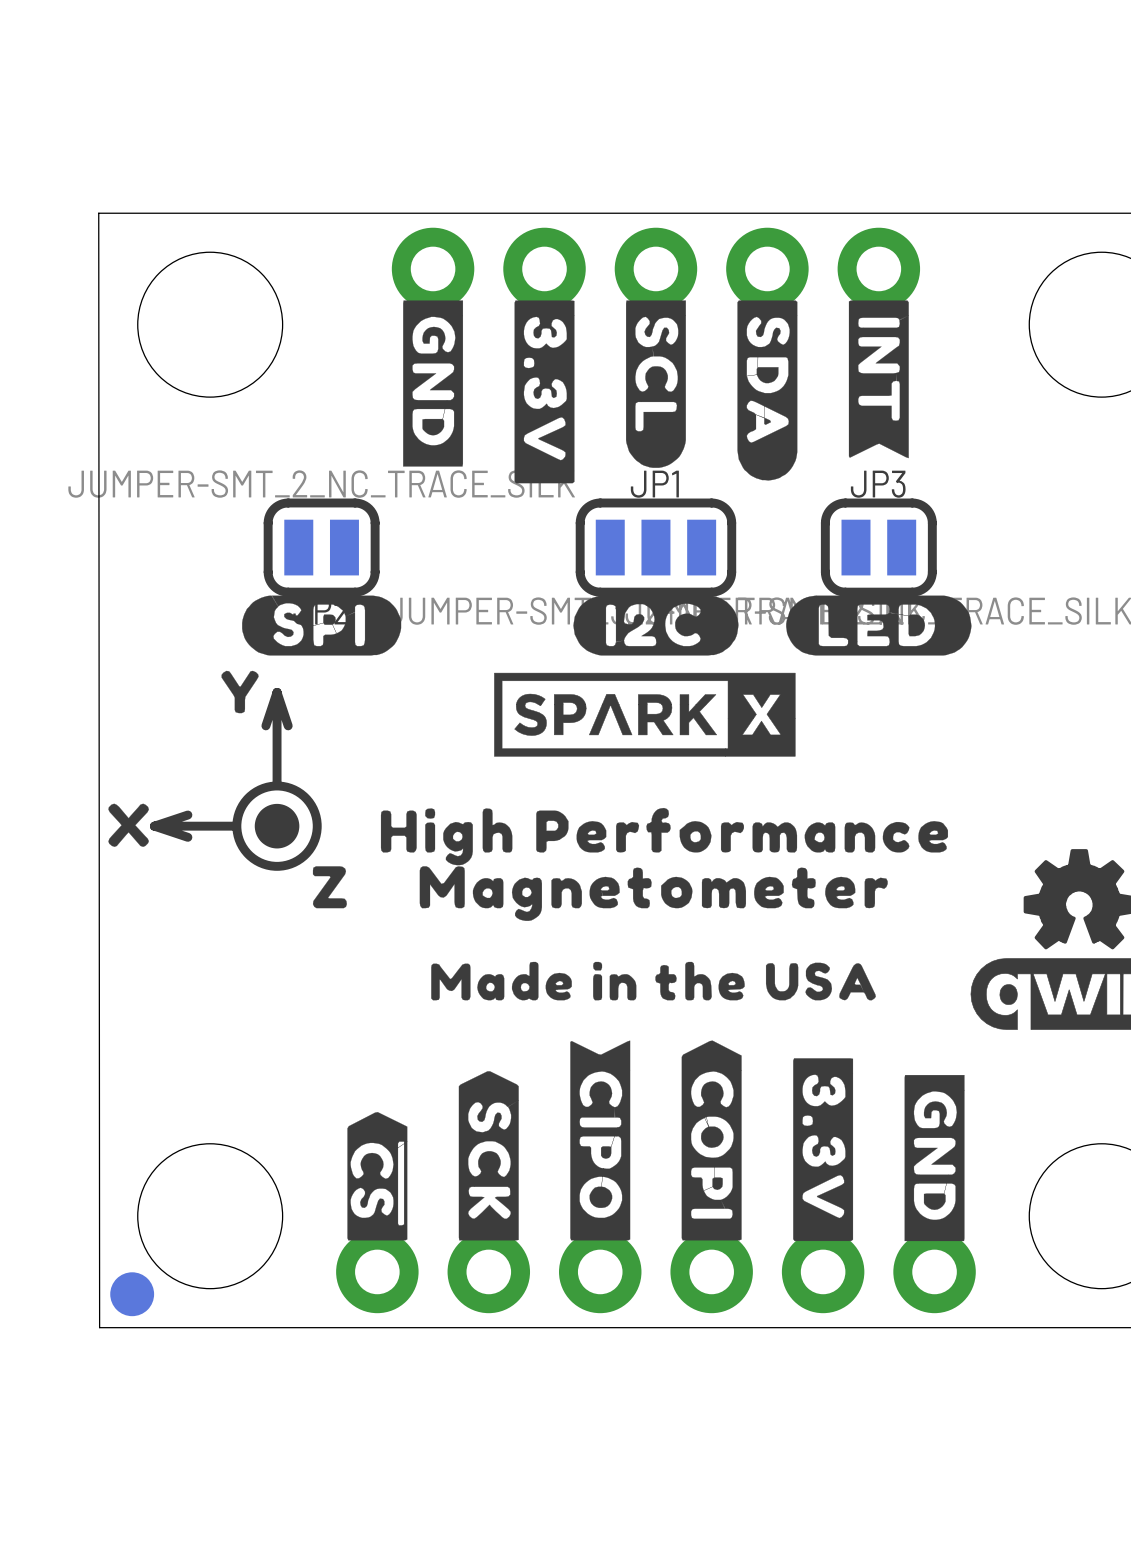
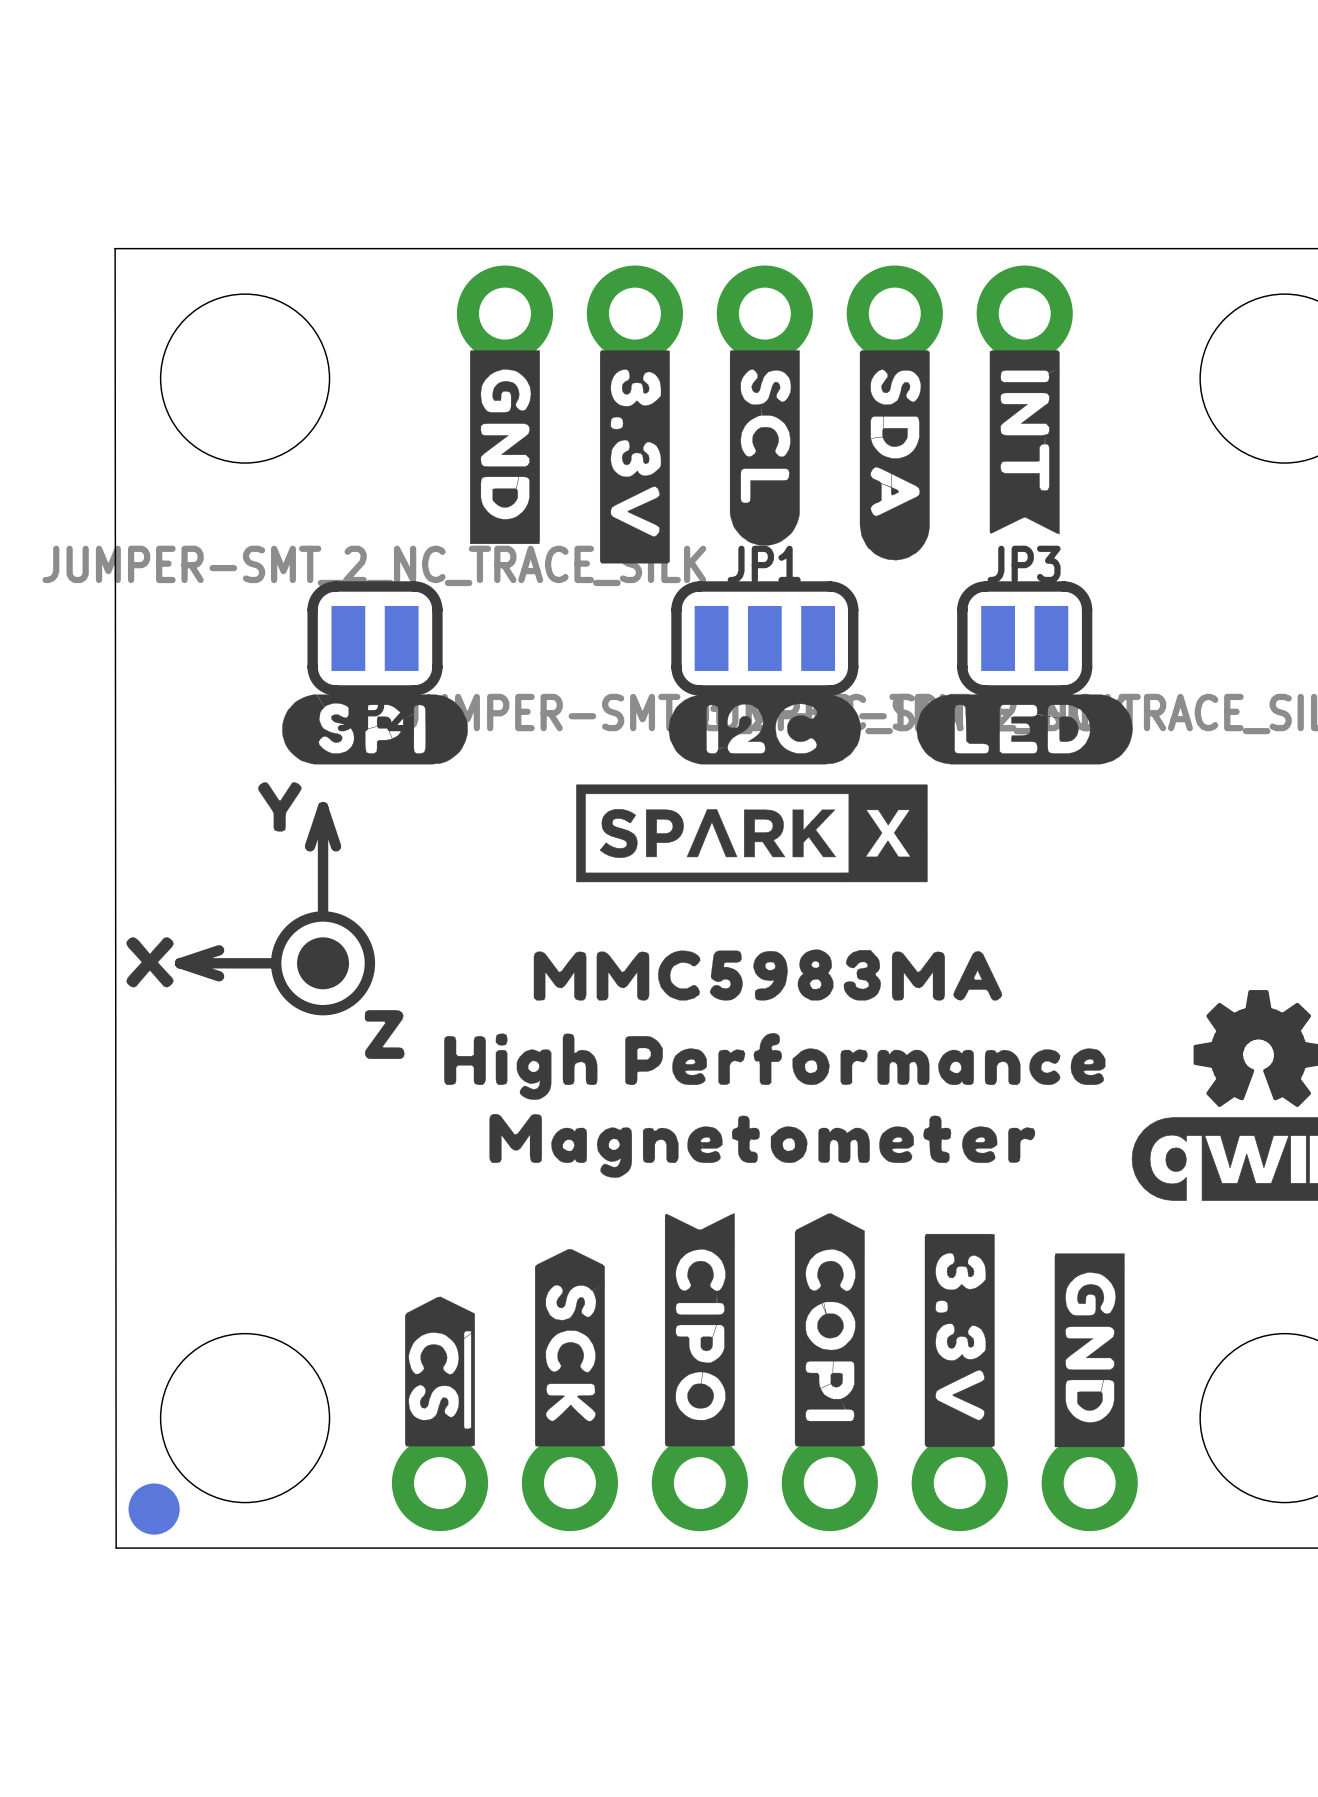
drawing: none -> [533, 949, 1003, 1001]
drawing position: (664, 836) -> (774, 1066)
drawing position: (653, 893) -> (762, 1145)
drawing: [431, 961, 876, 1001] -> none

